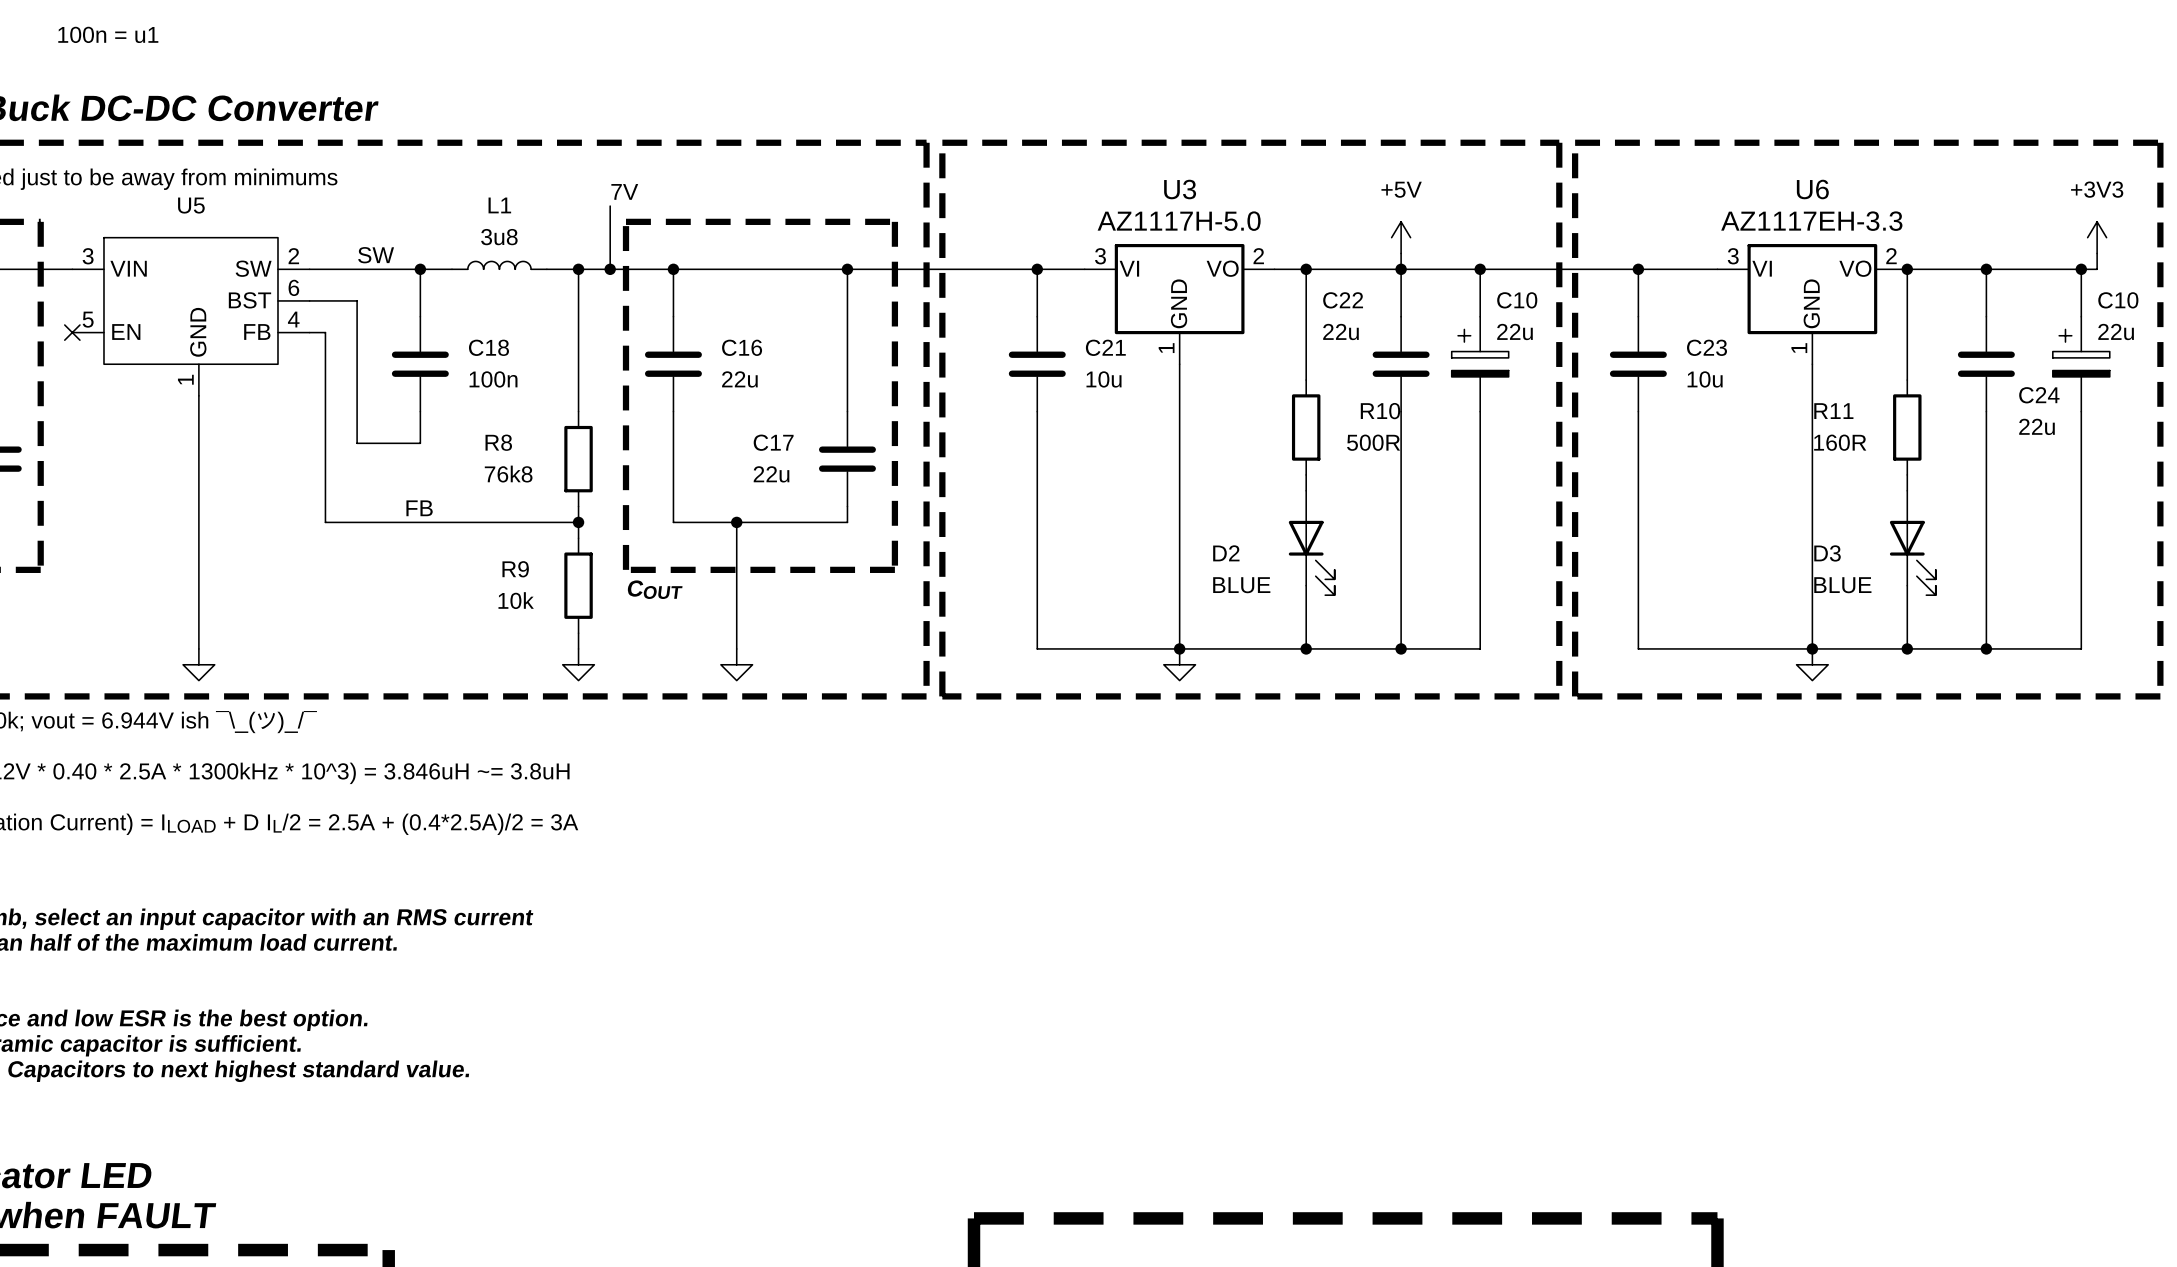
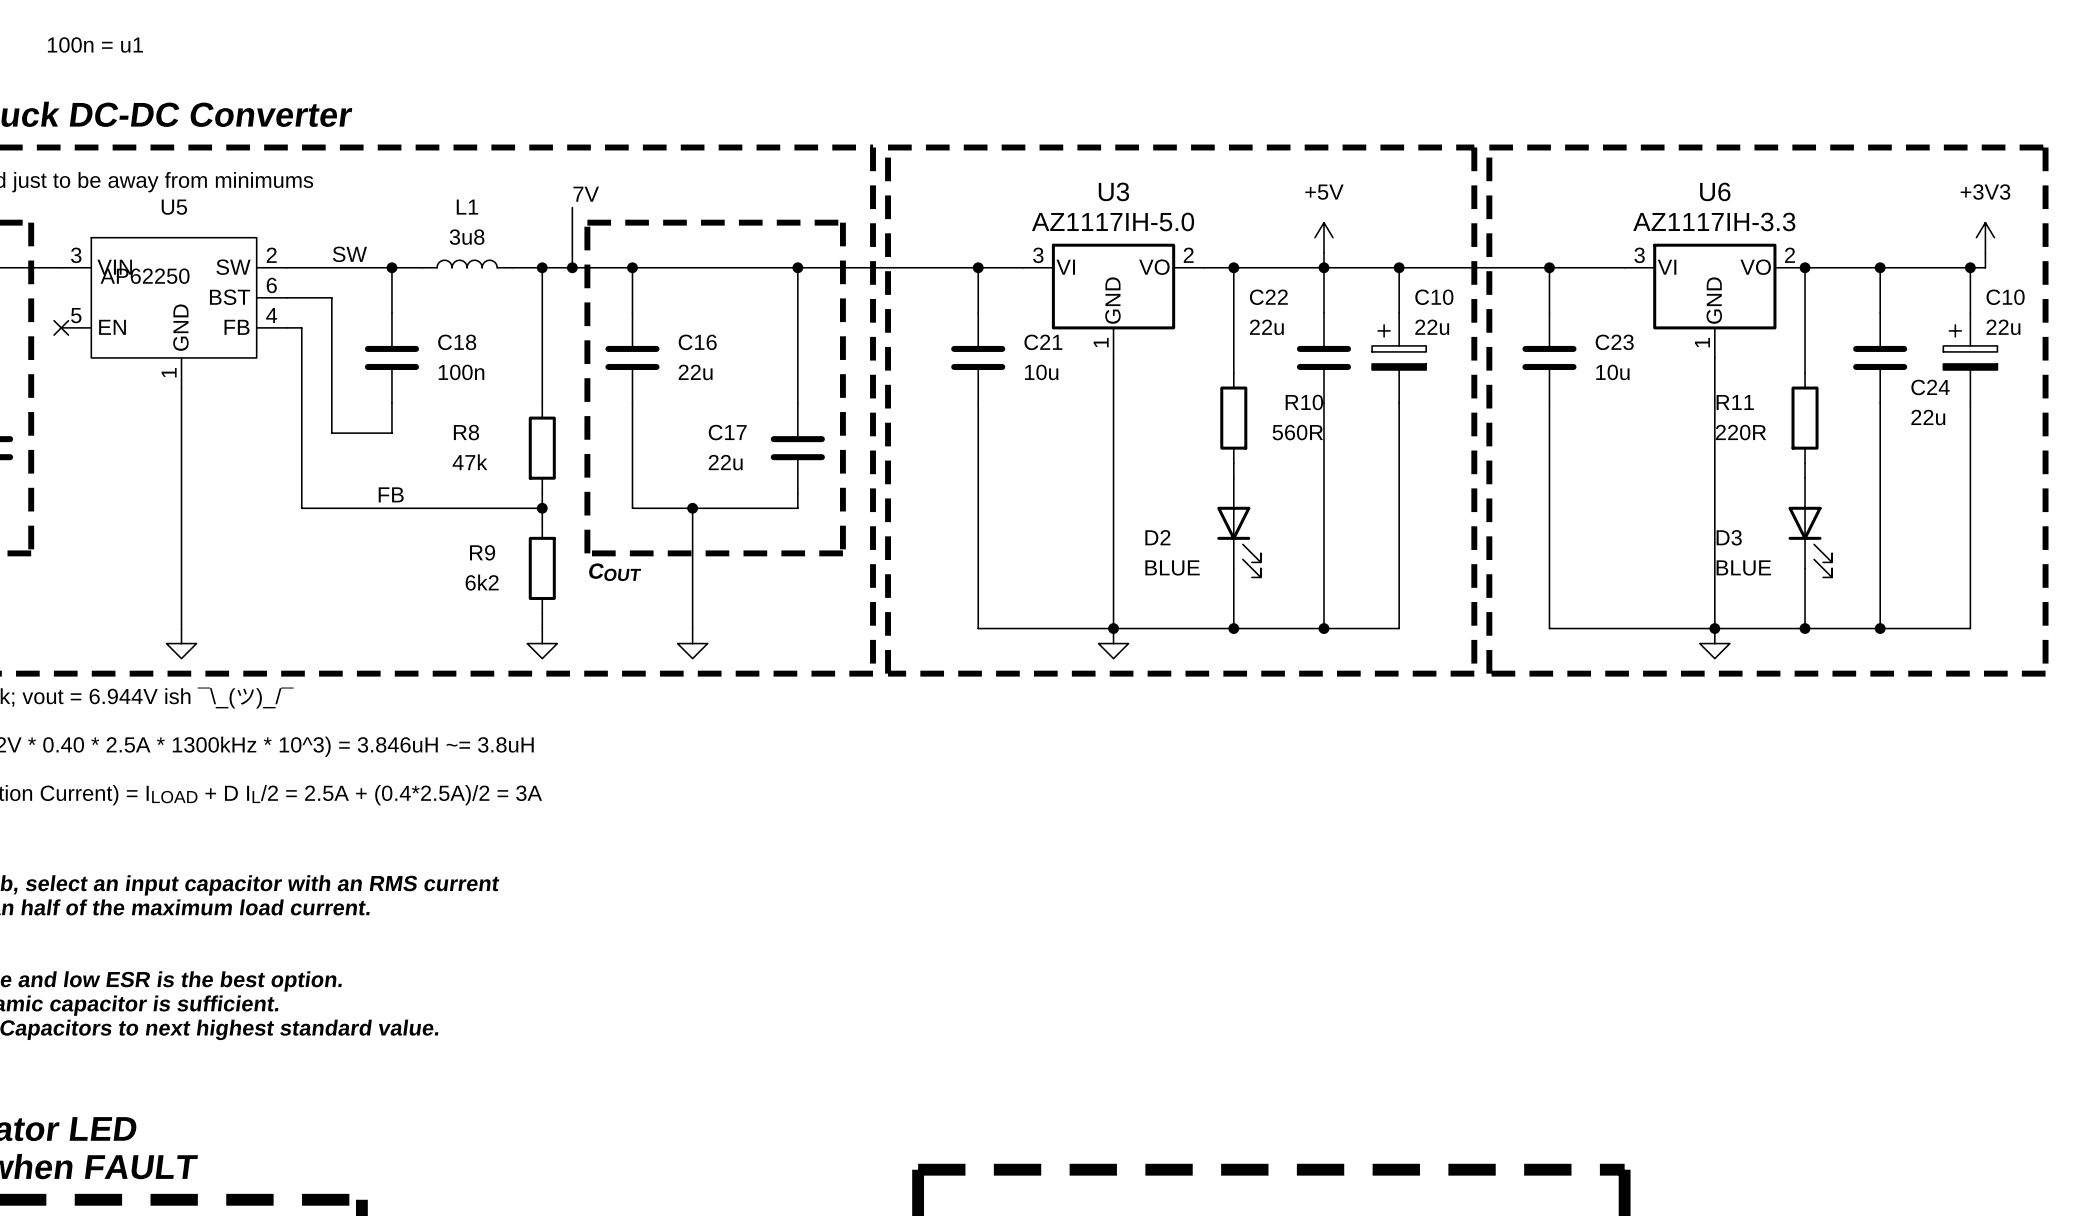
U3 value: AZ1117H-5.0 (1179, 221) -> AZ1117IH-5.0 (1113, 221)
U6 value: AZ1117EH-3.3 (1811, 221) -> AZ1117IH-3.3 (1714, 221)
U5 value: none -> AP62250 (145, 276)
R10 value: 500R (1373, 442) -> 560R (1297, 432)
R11 value: 160R (1840, 442) -> 220R (1740, 432)
R8 value: 76k8 (508, 474) -> 47k (469, 462)
R9 value: 10k (516, 600) -> 6k2 (482, 582)

